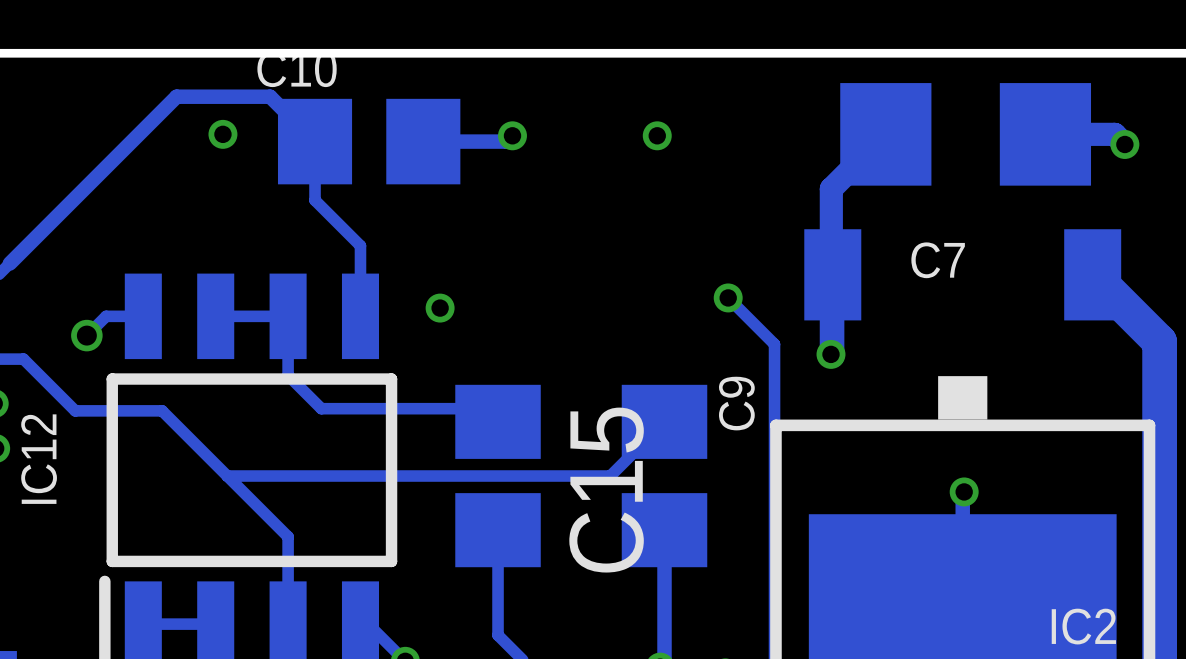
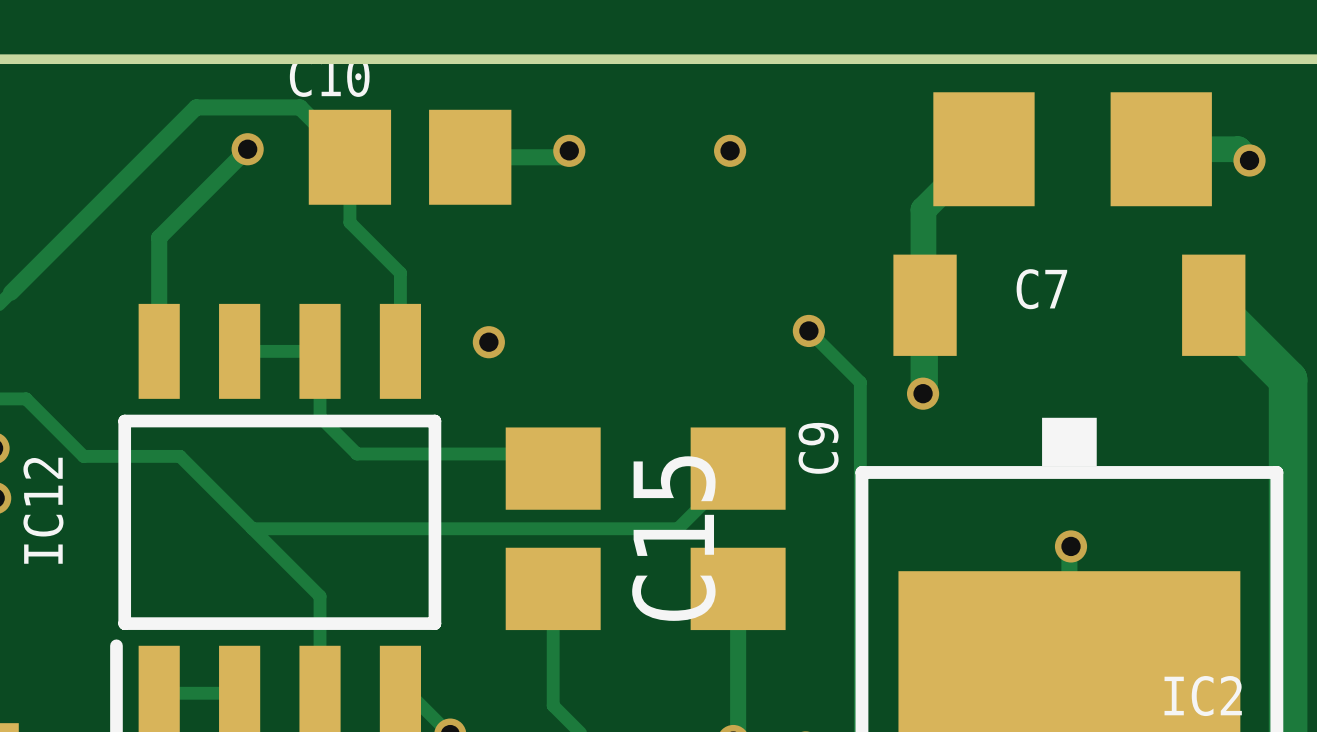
track: (143, 316) (106, 316) (86, 335) -> (159, 351) (159, 237) (247, 149)
via: (86, 335) -> none

